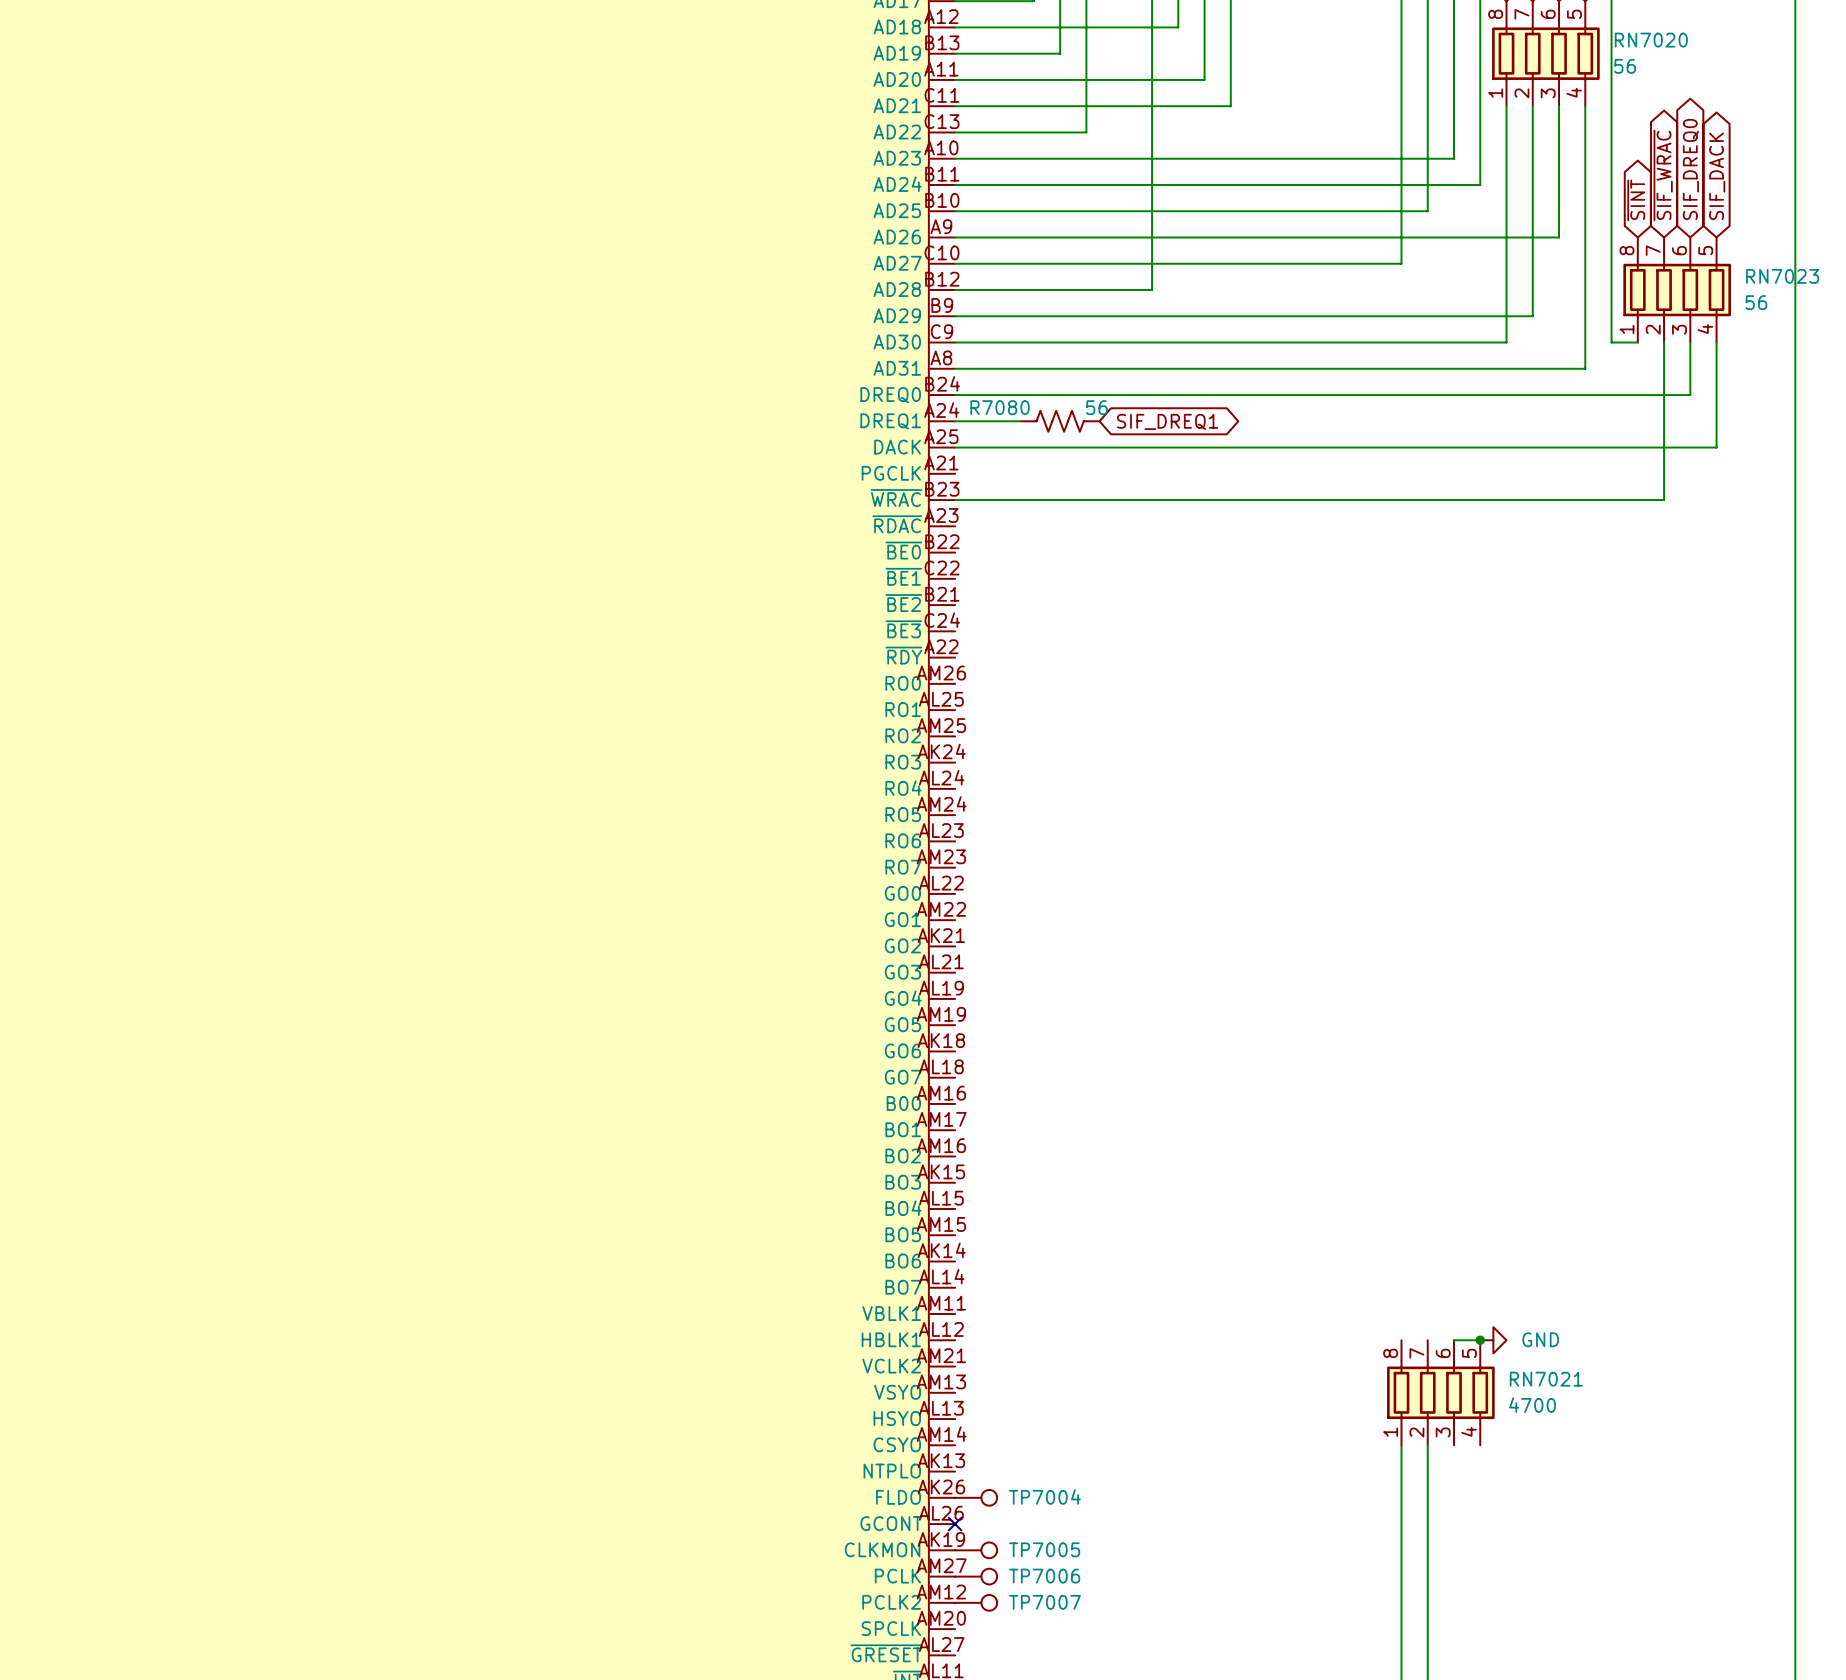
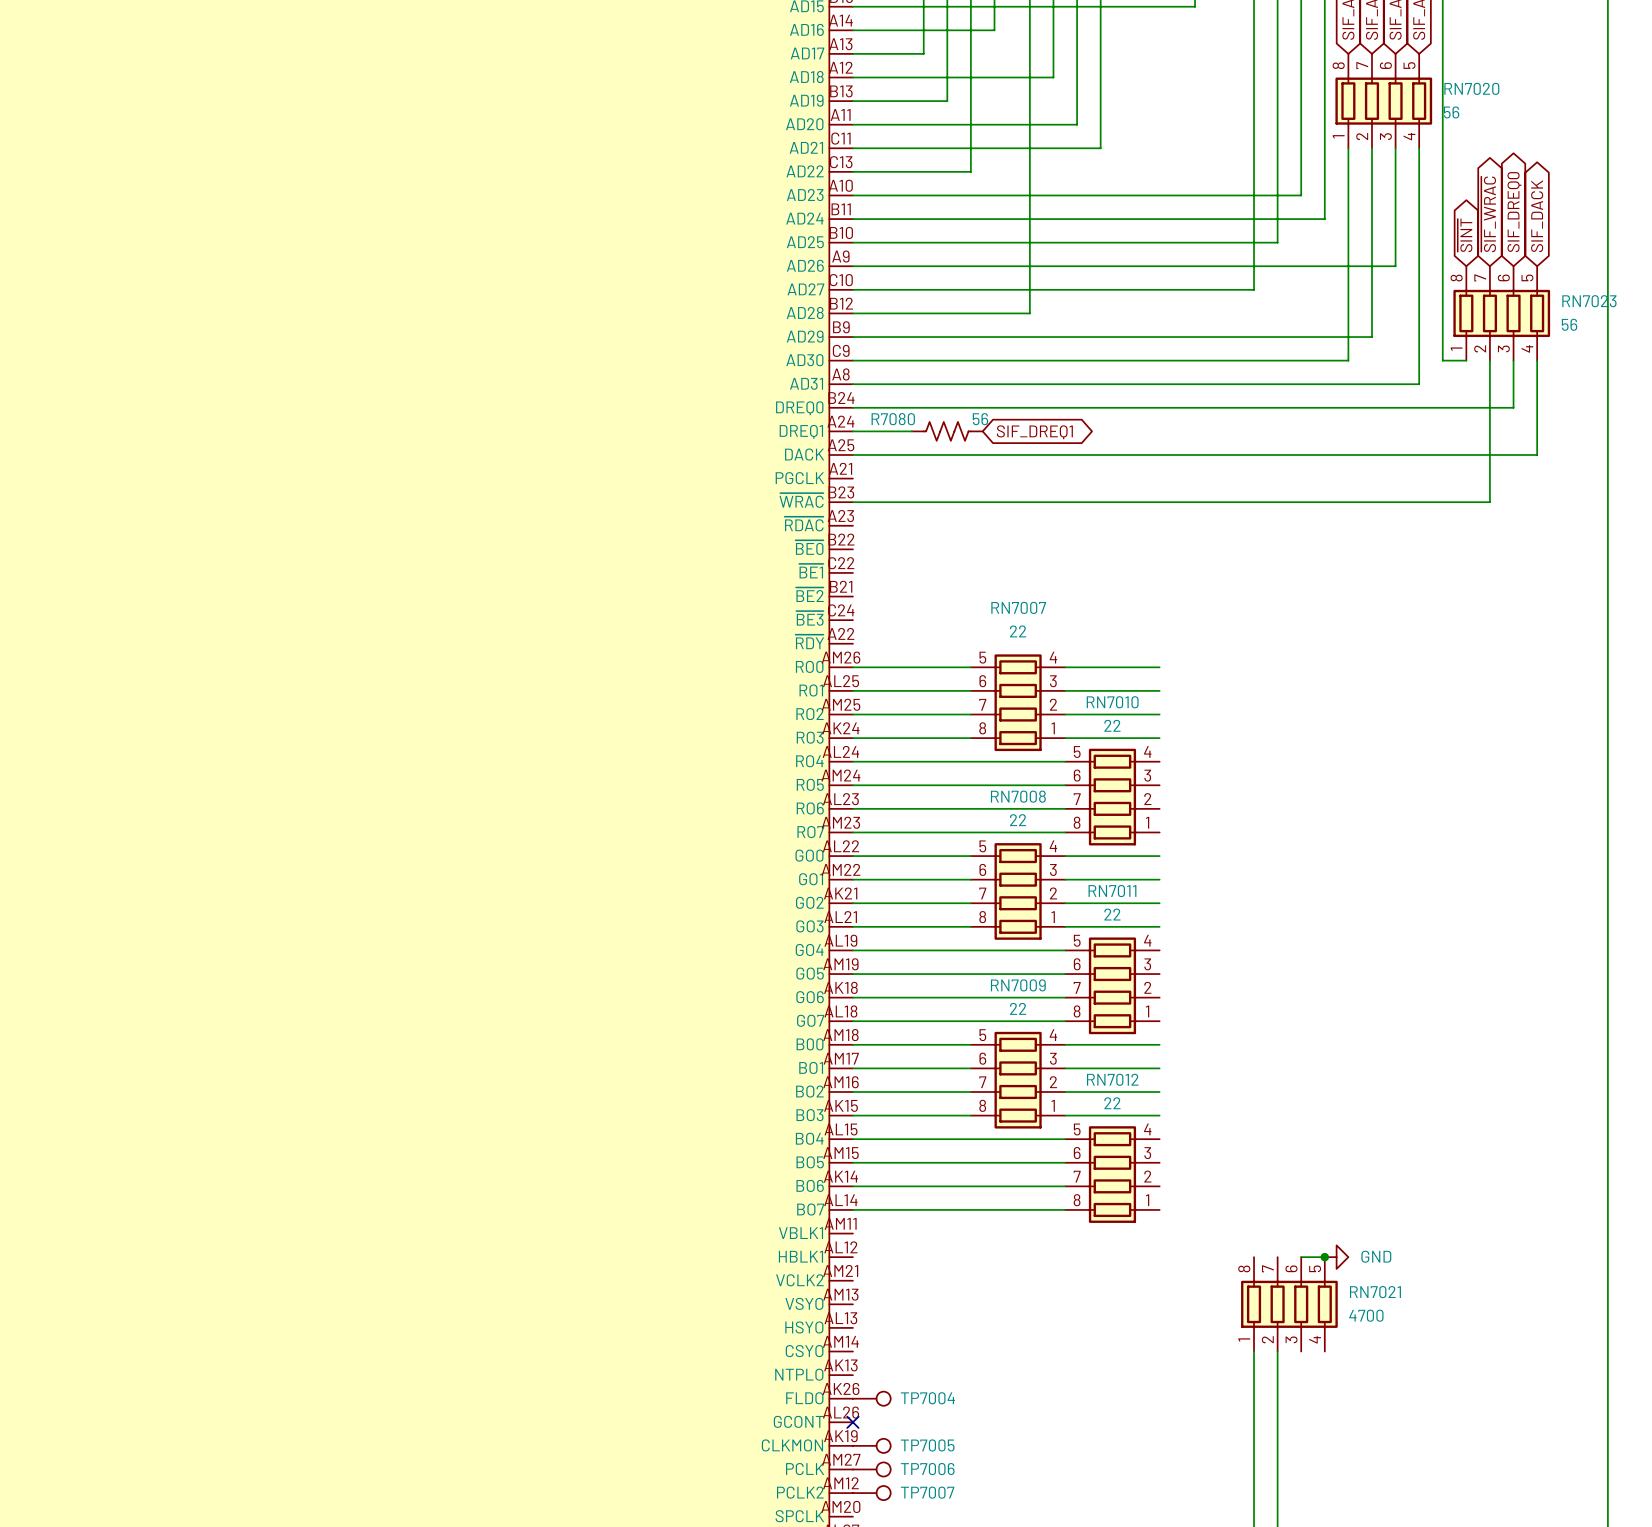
wire: none -> (852, 667) (970, 667)
wire: none -> (1065, 667) (1159, 667)
wire: none -> (852, 690) (970, 690)
wire: none -> (1065, 690) (1159, 690)
RN7007: none -> 22 (1018, 702)
wire: none -> (852, 714) (970, 714)
wire: none -> (1065, 714) (1159, 714)
wire: none -> (852, 738) (970, 738)
wire: none -> (1065, 738) (1159, 738)
wire: none -> (852, 761) (1065, 761)
wire: none -> (852, 785) (1065, 785)
RN7010: none -> 22 (1112, 797)
wire: none -> (852, 808) (1065, 808)
wire: none -> (852, 832) (1065, 832)
wire: none -> (852, 856) (970, 856)
wire: none -> (1065, 856) (1159, 856)
wire: none -> (852, 879) (970, 879)
wire: none -> (1065, 879) (1159, 879)
RN7008: none -> 22 (1018, 891)
wire: none -> (852, 903) (970, 903)
wire: none -> (1065, 903) (1159, 903)
wire: none -> (852, 926) (970, 926)
wire: none -> (1065, 926) (1159, 926)
wire: none -> (852, 950) (1065, 950)
wire: none -> (852, 974) (1065, 974)
RN7011: none -> 22 (1112, 985)
wire: none -> (852, 997) (1065, 997)
wire: none -> (852, 1021) (1065, 1021)
part pin number: AM16 (941, 1093) -> AM18 (840, 1035)
wire: none -> (852, 1044) (970, 1044)
wire: none -> (1065, 1044) (1159, 1044)
wire: none -> (852, 1068) (970, 1068)
wire: none -> (1065, 1068) (1159, 1068)
RN7009: none -> 22 (1018, 1080)
wire: none -> (852, 1091) (970, 1091)
wire: none -> (1065, 1091) (1159, 1091)
wire: none -> (852, 1115) (970, 1115)
wire: none -> (1065, 1115) (1159, 1115)
wire: none -> (852, 1139) (1065, 1139)
wire: none -> (852, 1162) (1065, 1162)
RN7012: none -> 22 (1112, 1174)
wire: none -> (852, 1186) (1065, 1186)
wire: none -> (852, 1209) (1065, 1209)

